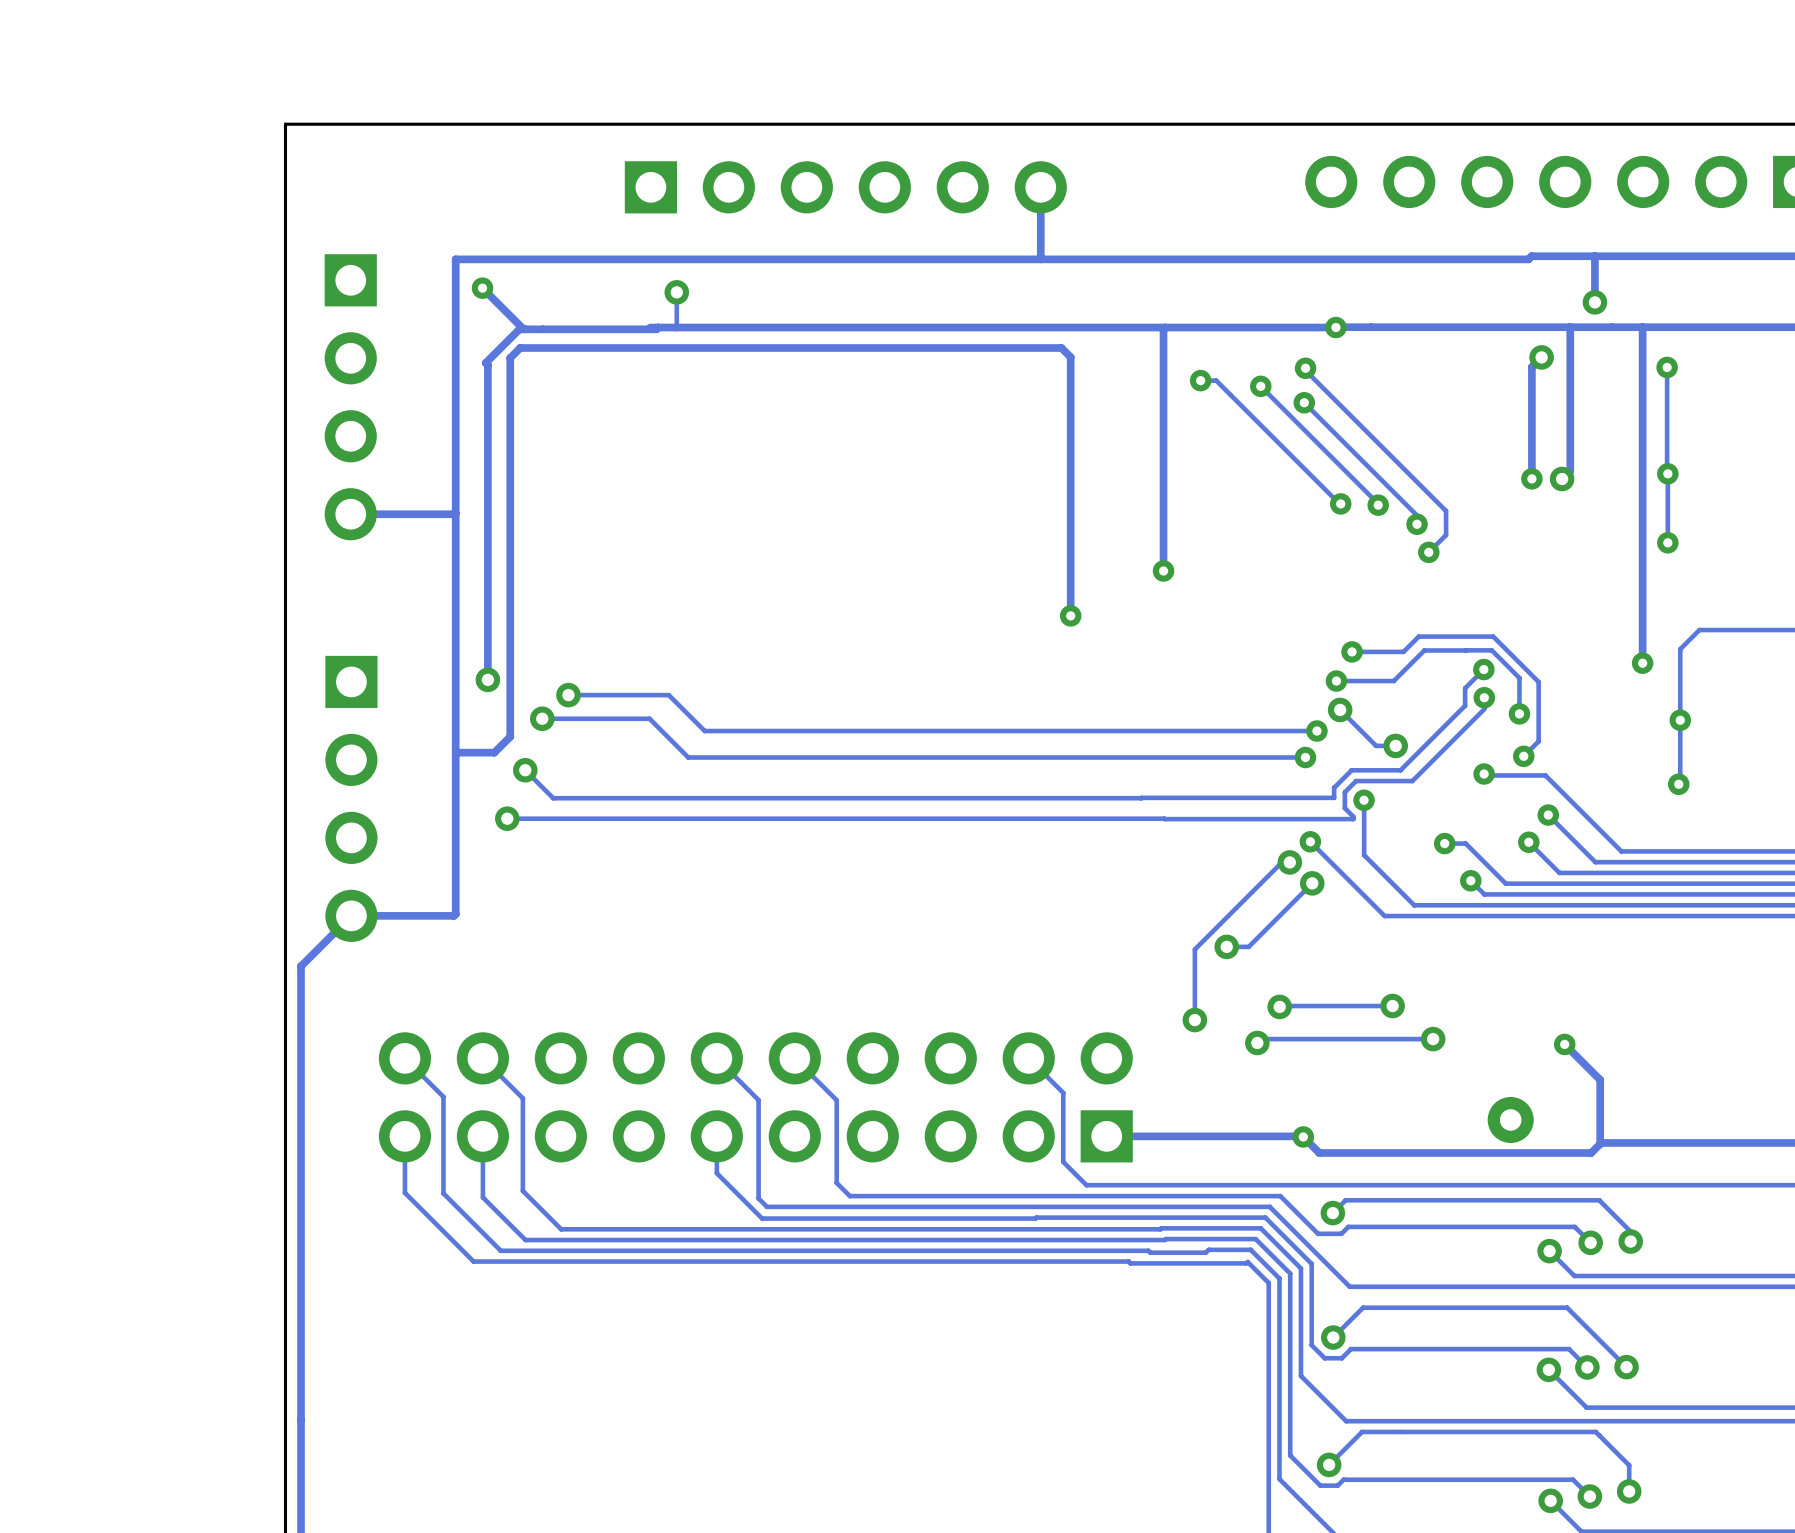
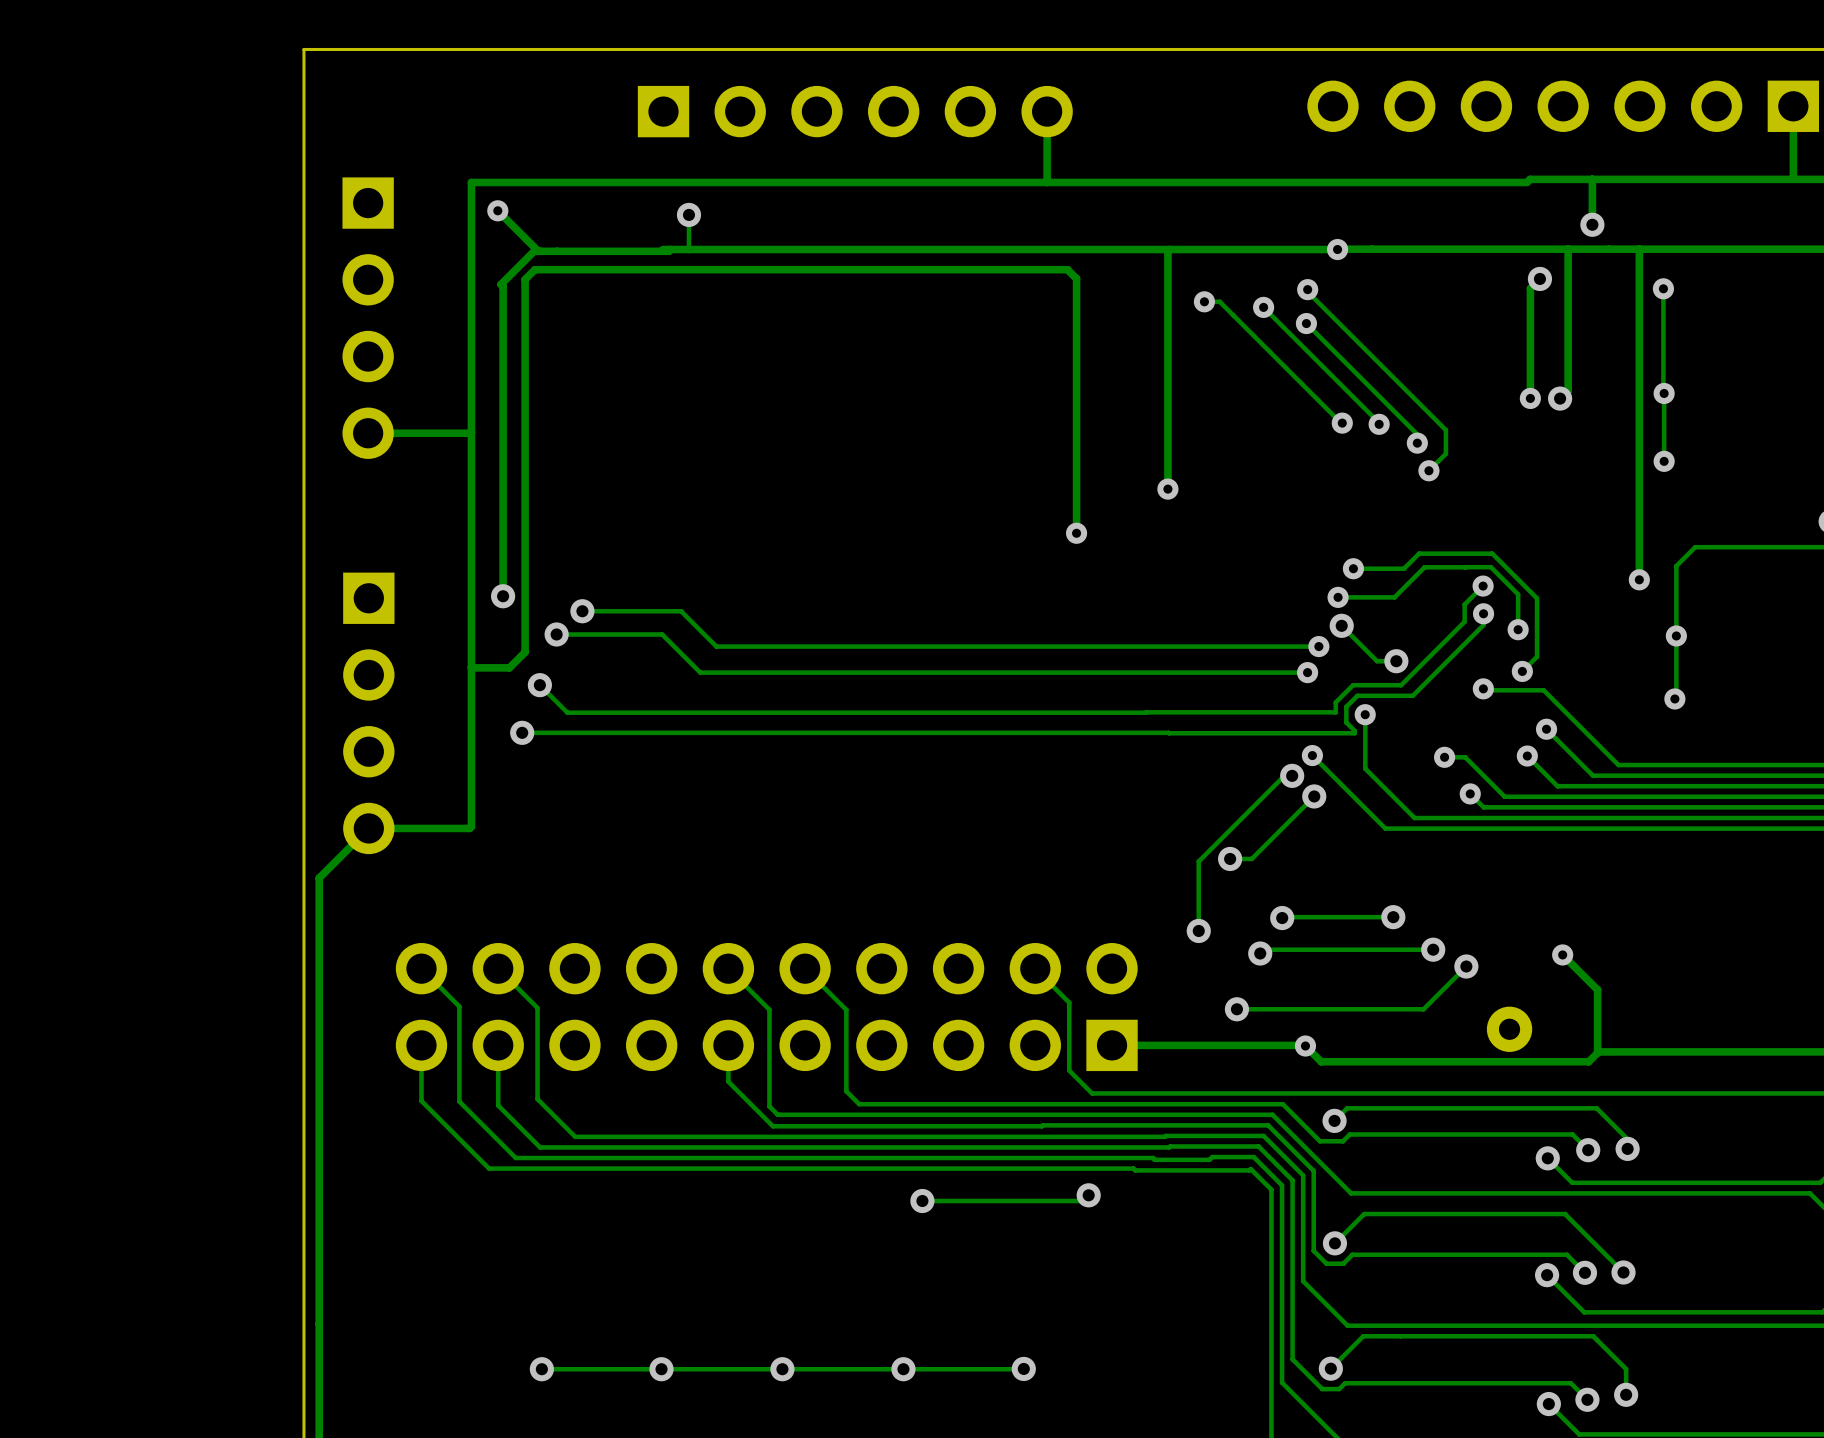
track: none -> (1466, 966) (1423, 1009) (1236, 1009)
via: none -> (1466, 966)
via: none -> (1236, 1009)
track: none -> (1088, 1195) (1082, 1201) (922, 1201)
via: none -> (1088, 1195)
via: none -> (922, 1201)
via: none -> (541, 1369)
via: none -> (661, 1369)
via: none -> (782, 1369)
via: none -> (903, 1369)
track: none -> (1023, 1369) (541, 1369)
via: none -> (1023, 1368)

